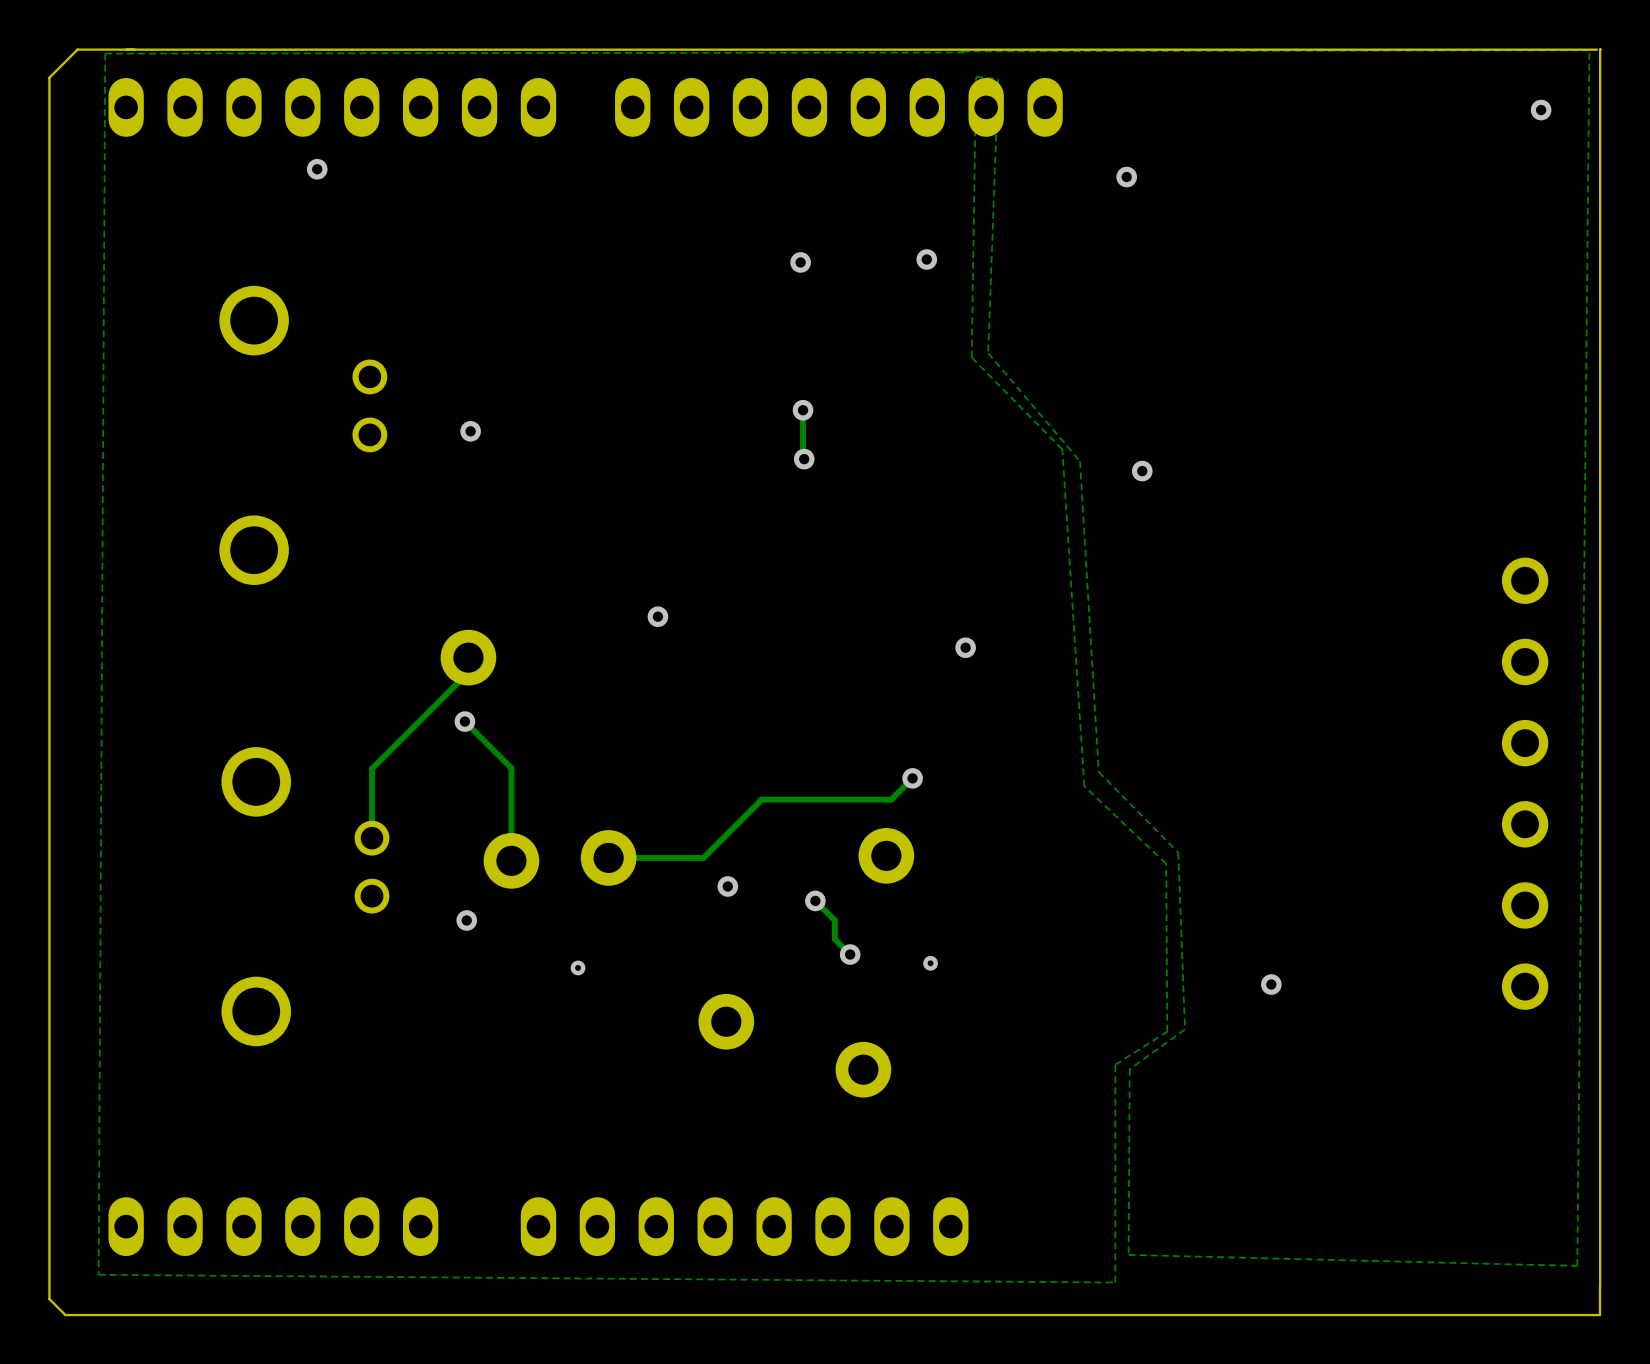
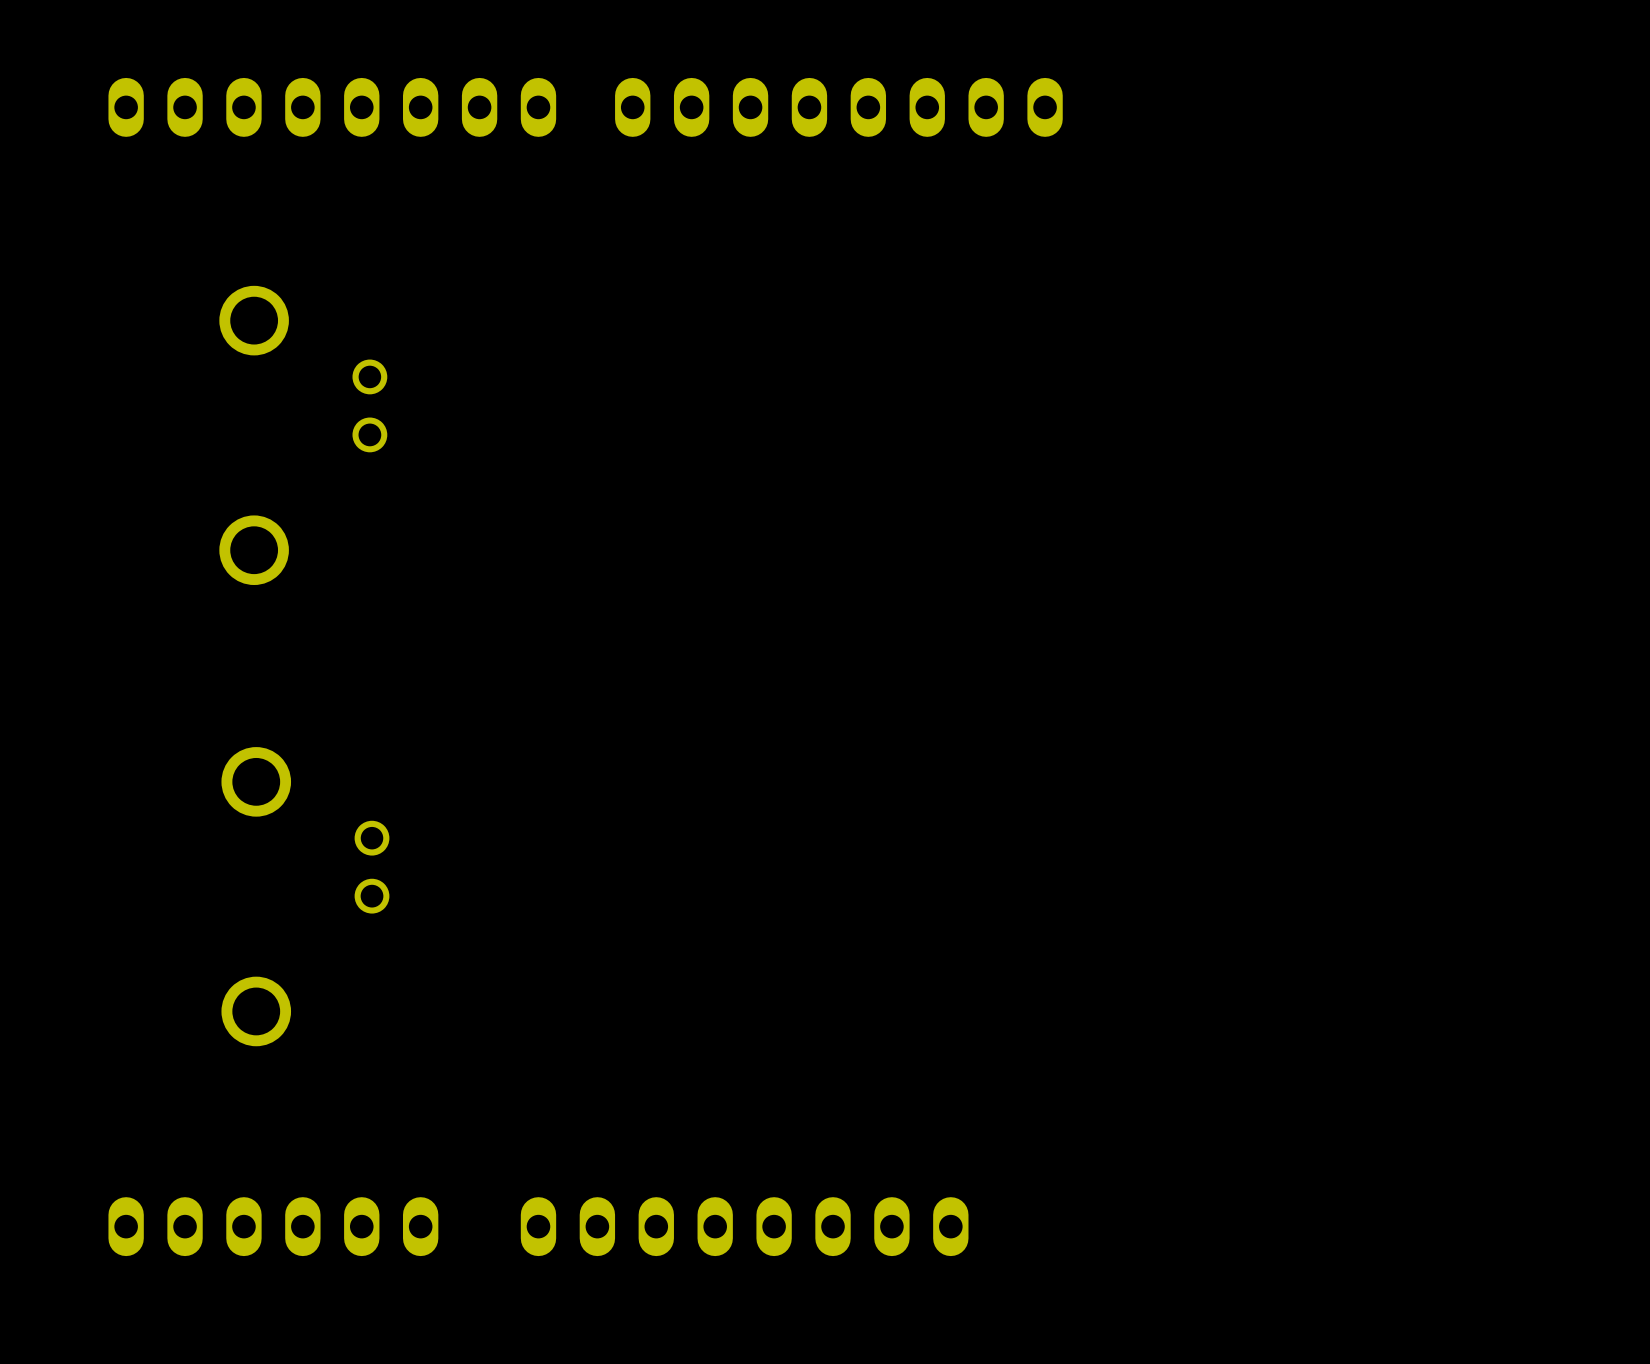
board edge: (1597, 49) (77, 50) -> none
board edge: (1600, 49) (1600, 1315) (65, 1315) -> none
board edge: (76, 50) (49, 77) (49, 1299) (65, 1314) -> none
zone outline: (1589, 50) (1577, 1265) (1128, 1254) (1129, 1069) (1184, 1029) (1178, 852) (1098, 771) (1080, 461) (988, 353) (998, 79) (976, 76) (971, 357) (1062, 449) (1084, 786) (1166, 863) (1167, 1031) (1115, 1064) (1115, 1282) (98, 1274) (105, 53) (1589, 50) -> none
via: (1541, 110) -> none
via: (317, 169) -> none
via: (1126, 177) -> none
via: (926, 259) -> none
via: (800, 262) -> none
track: (803, 410) (804, 459) -> none
via: (803, 410) -> none
via: (470, 431) -> none
via: (804, 459) -> none
via: (1142, 471) -> none
via: (657, 616) -> none
via: (965, 647) -> none
track: (468, 657) (468, 672) (372, 768) (372, 838) -> none
part: (468, 657) -> none
track: (464, 721) (511, 768) (511, 860) -> none
via: (464, 721) -> none
track: (912, 778) (891, 799) (761, 799) (703, 857) (608, 857) -> none
via: (912, 778) -> none
part: (1525, 783) -> none
part: (886, 855) -> none
part: (608, 857) -> none
part: (511, 860) -> none
via: (727, 886) -> none
track: (815, 900) (834, 920) (834, 939) (850, 954) -> none
via: (815, 900) -> none
via: (466, 920) -> none
via: (850, 954) -> none
via: (930, 963) -> none
via: (578, 967) -> none
via: (1271, 984) -> none
part: (726, 1021) -> none
part: (863, 1069) -> none

